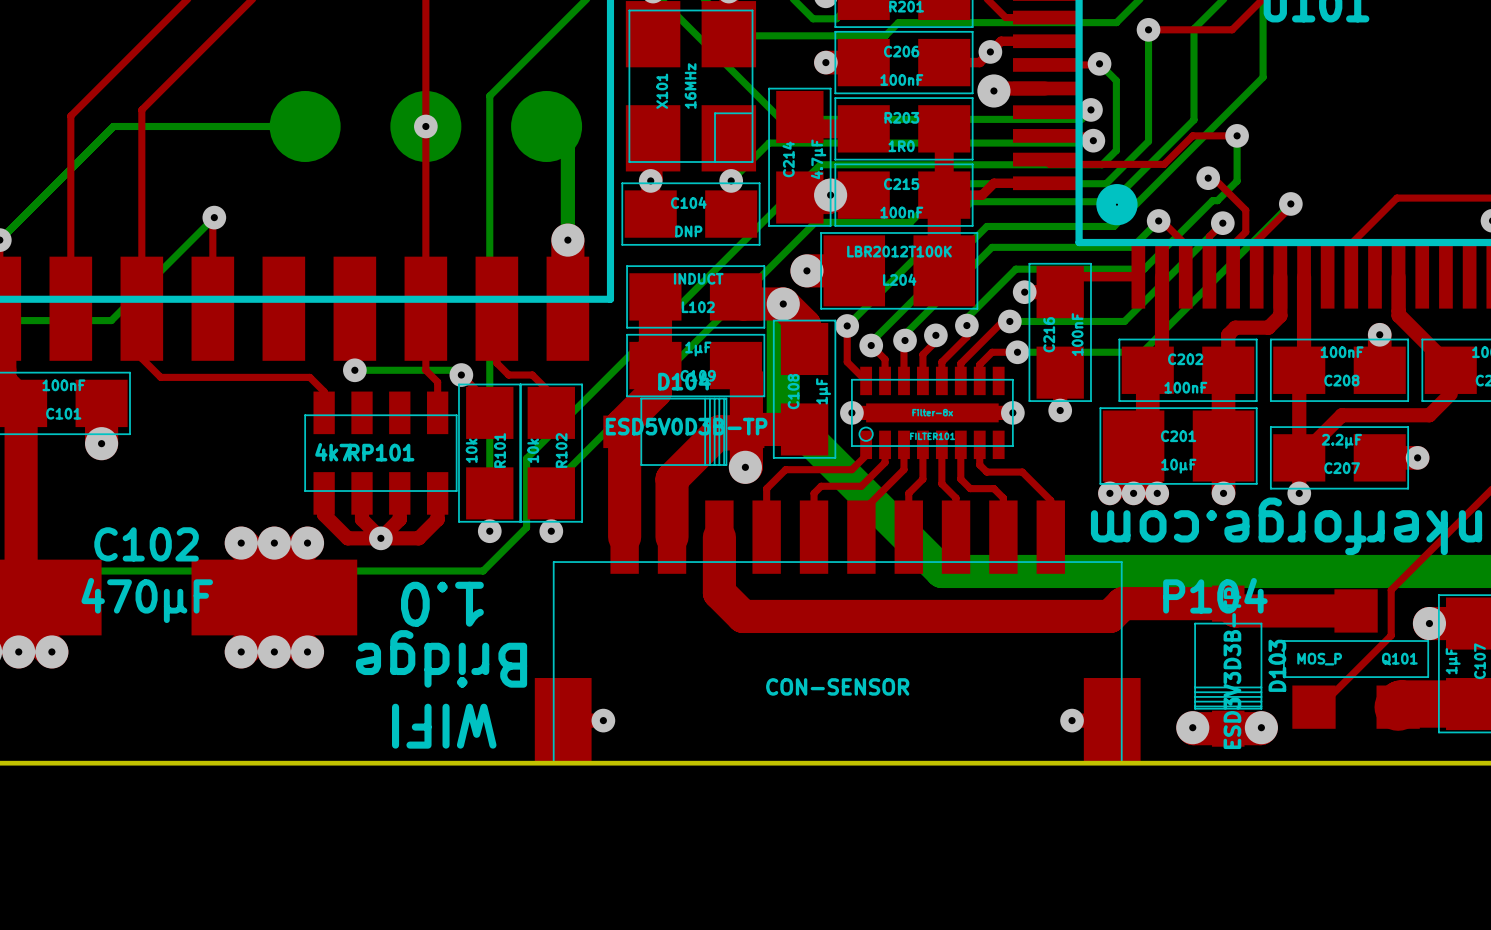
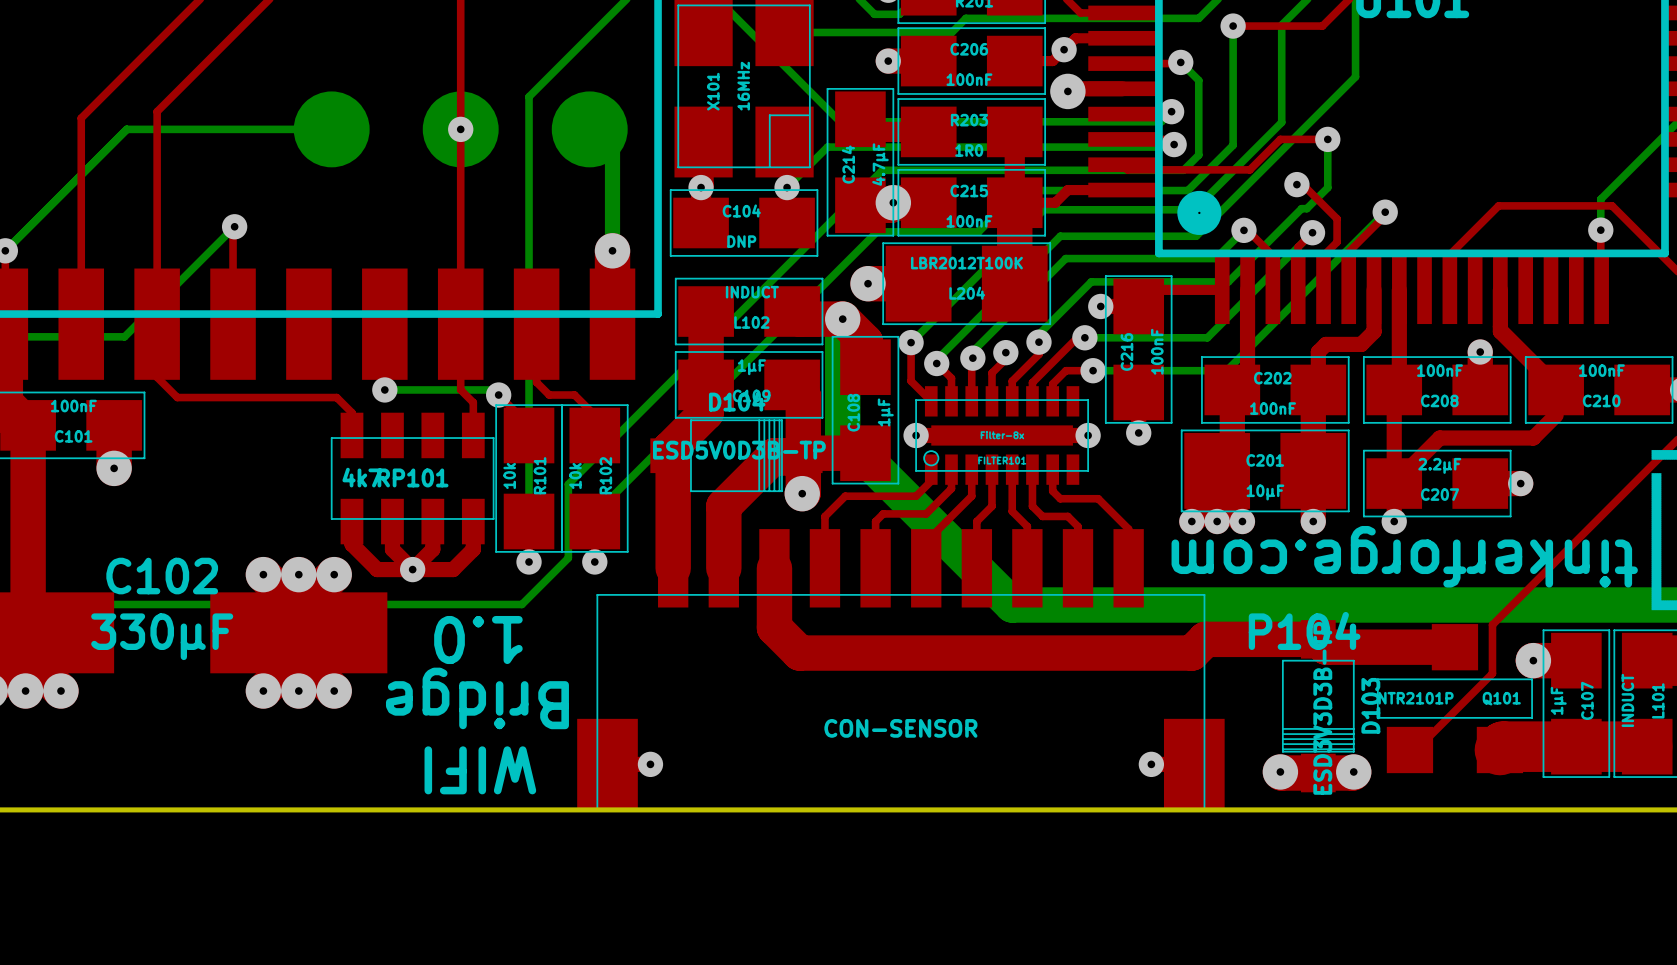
C102 value: 470µF (147, 600) -> 330µF (162, 636)
Q101 value: MOS_P (1319, 659) -> NTR2101P (1415, 698)

